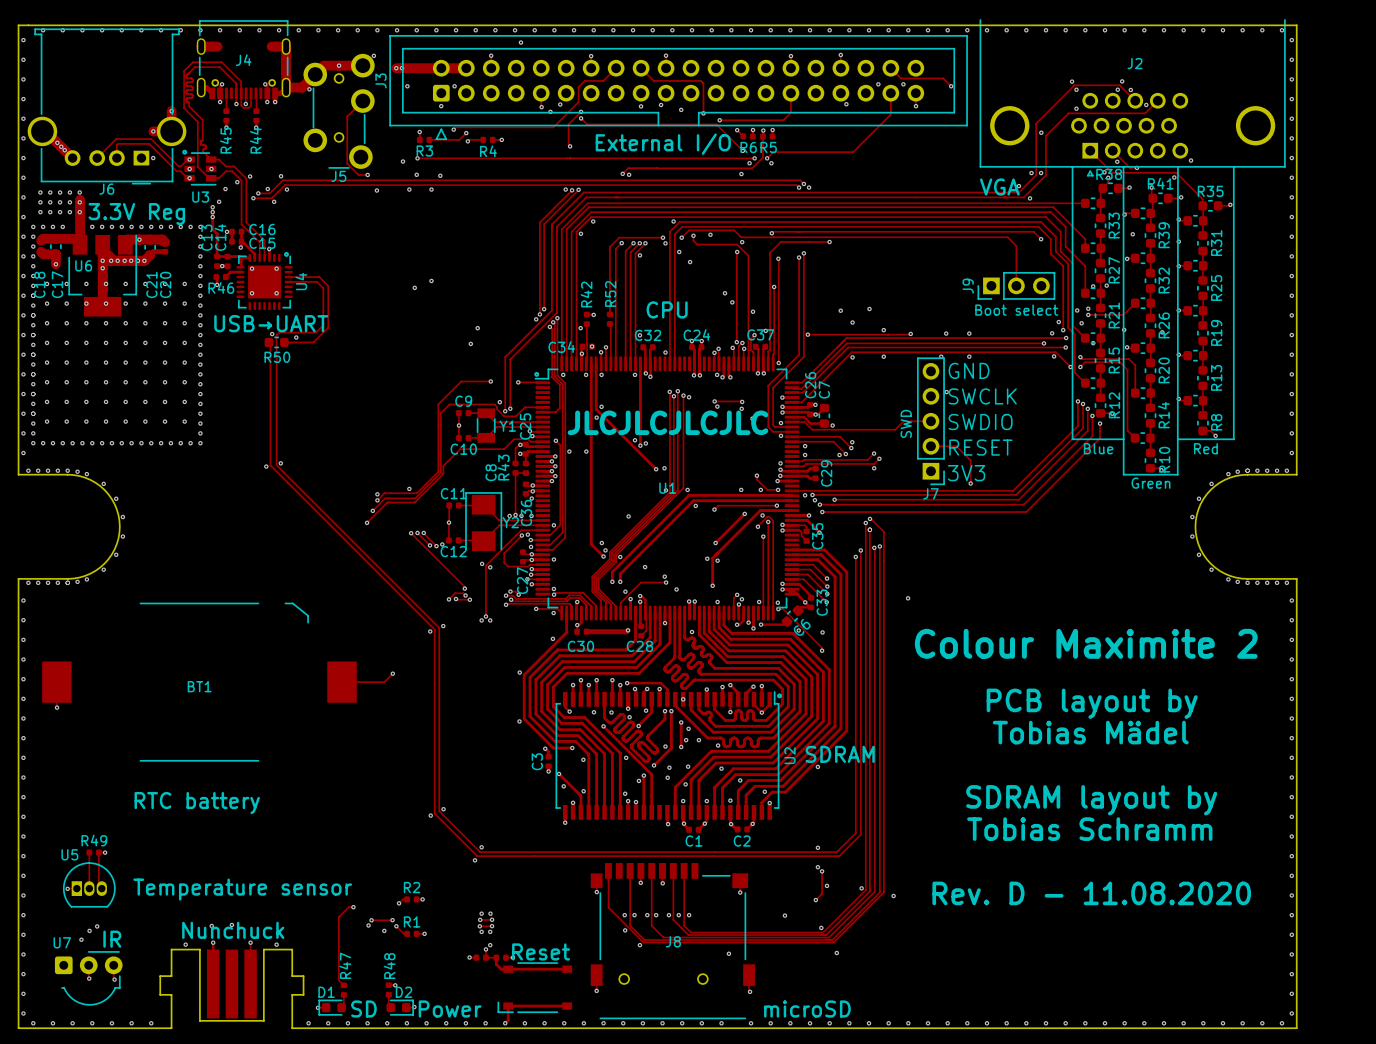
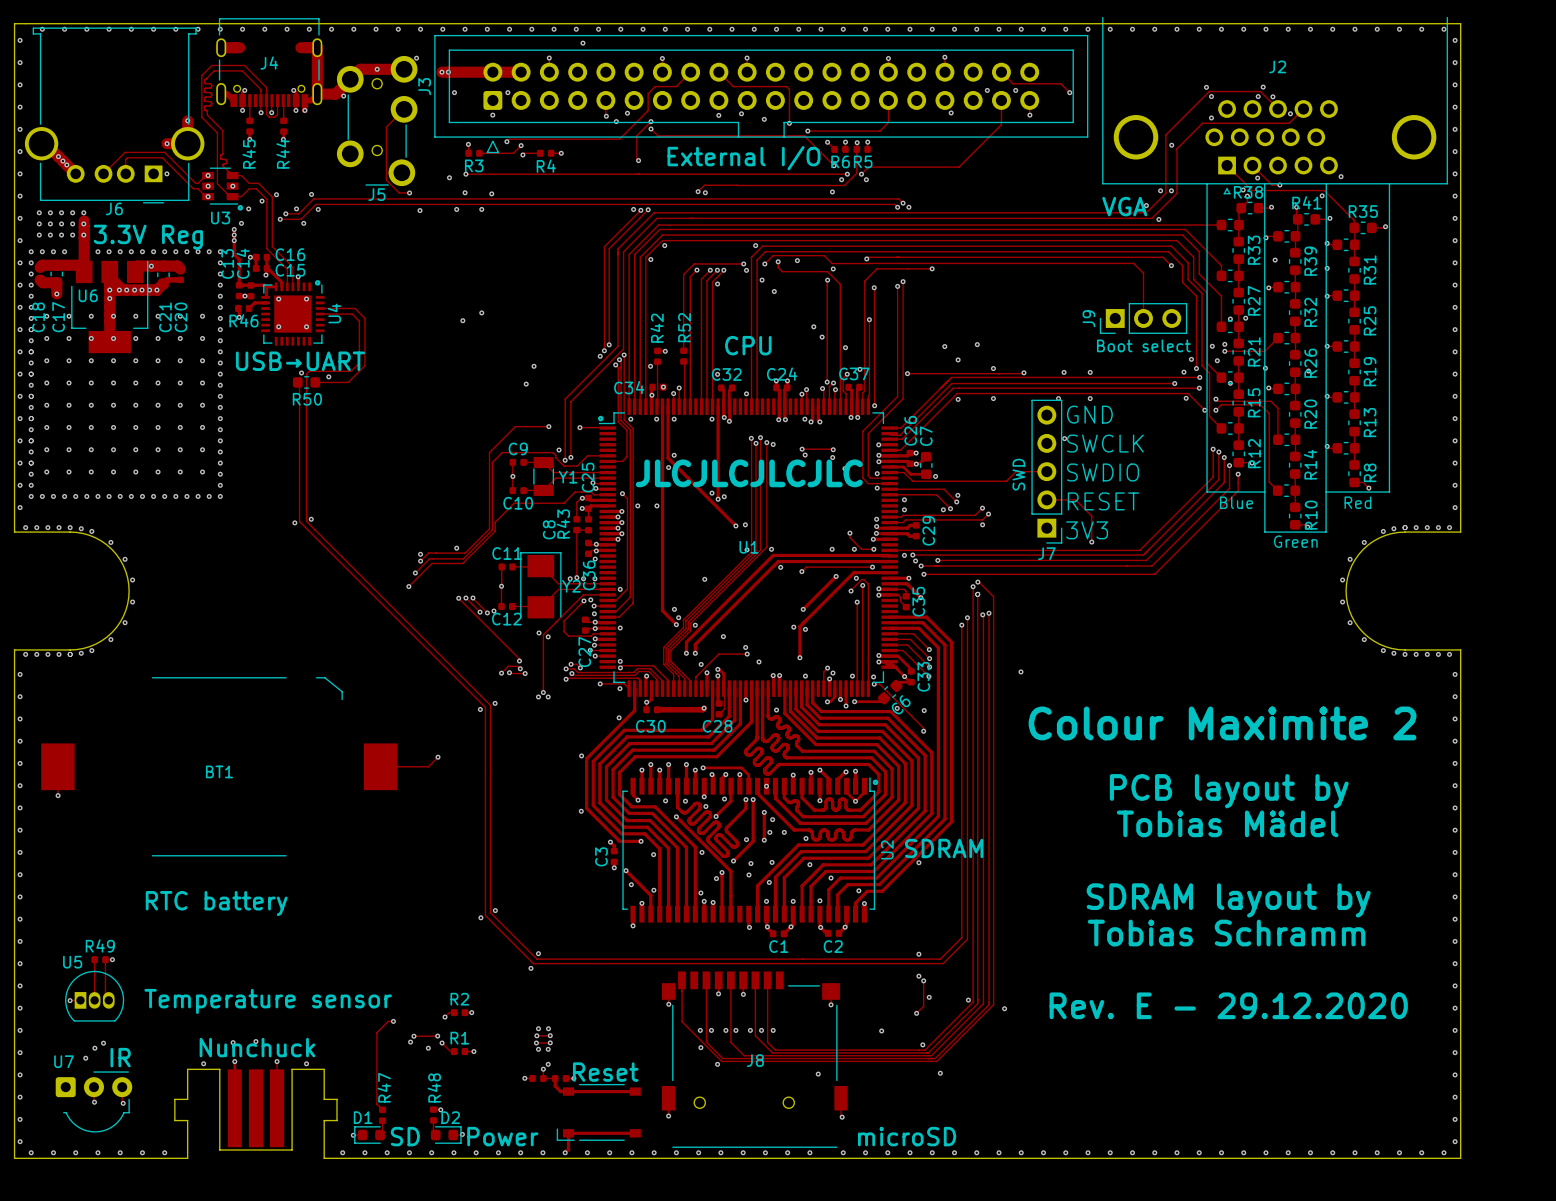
drawing position: (184, 152) -> (240, 207)
text: Rev. D - 11.08.2020 (1091, 893) -> Rev. E - 29.12.2020 (1228, 1005)

